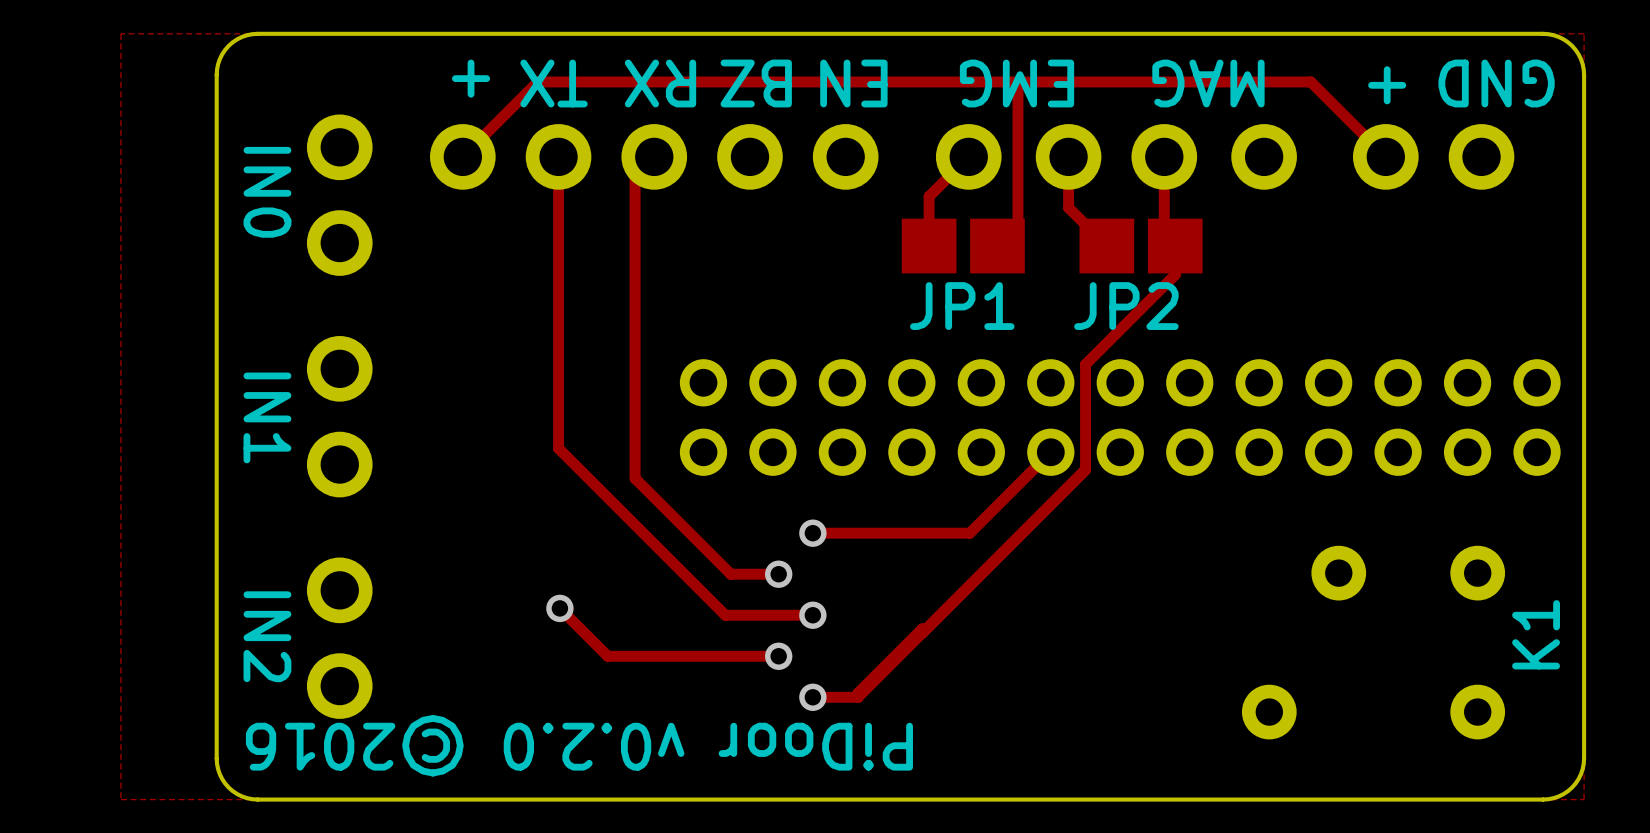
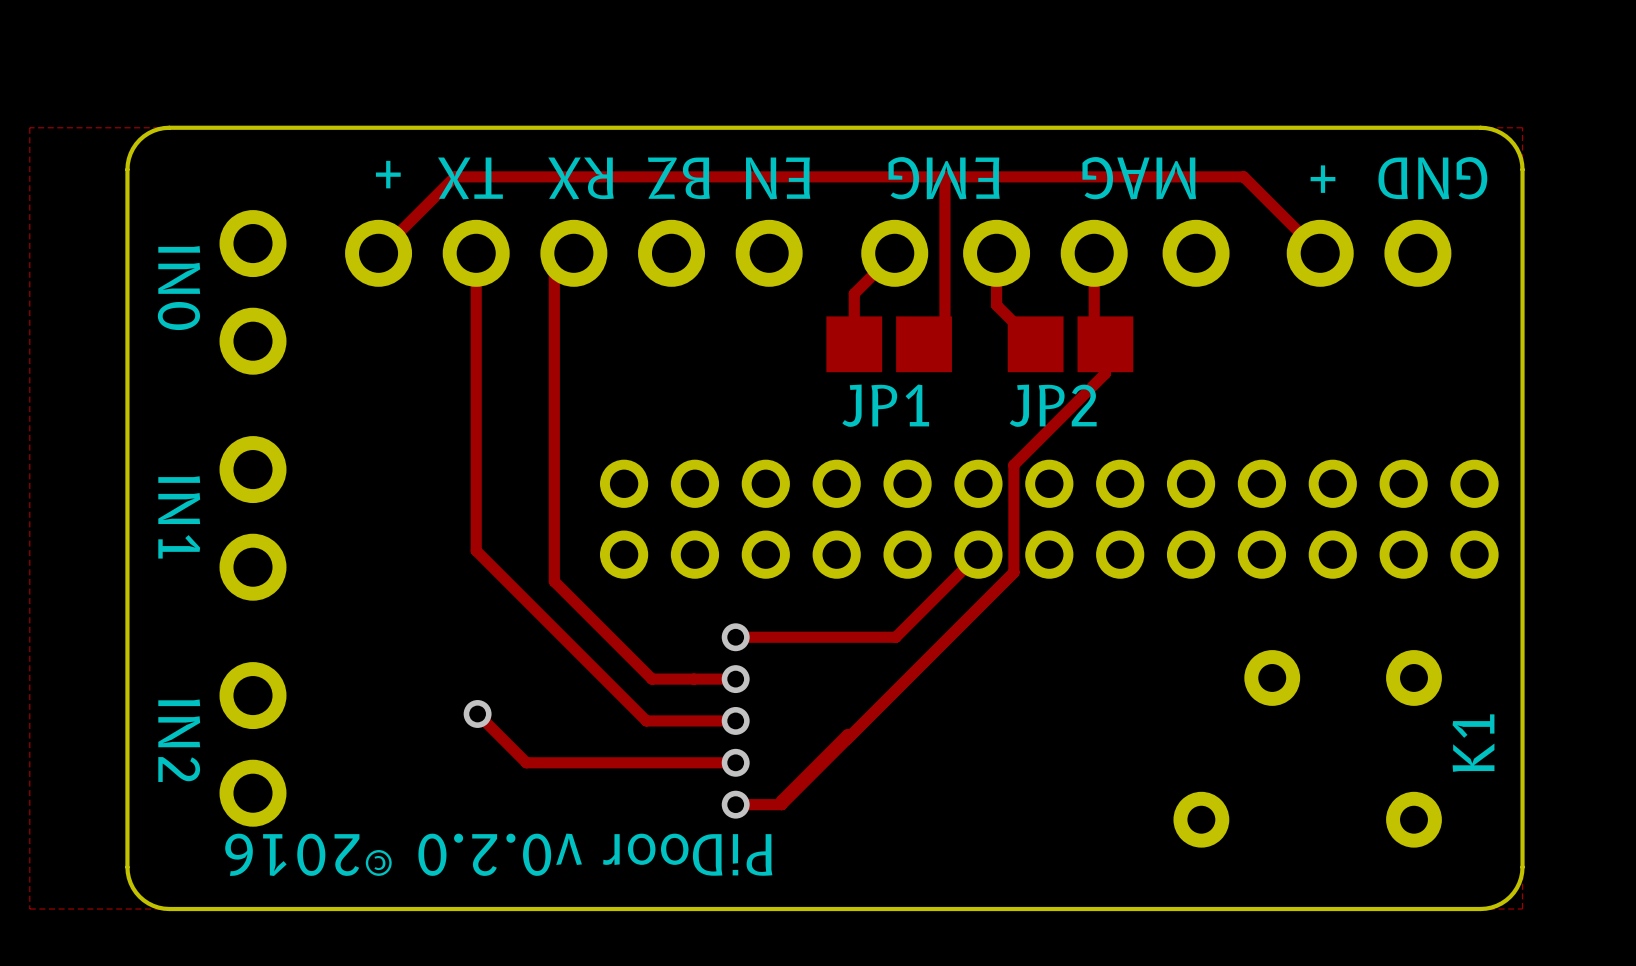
track: none -> (700, 679) (735, 679)
via position: (778, 574) -> (735, 679)
track: none -> (700, 762) (735, 762)
via position: (778, 656) -> (735, 762)

